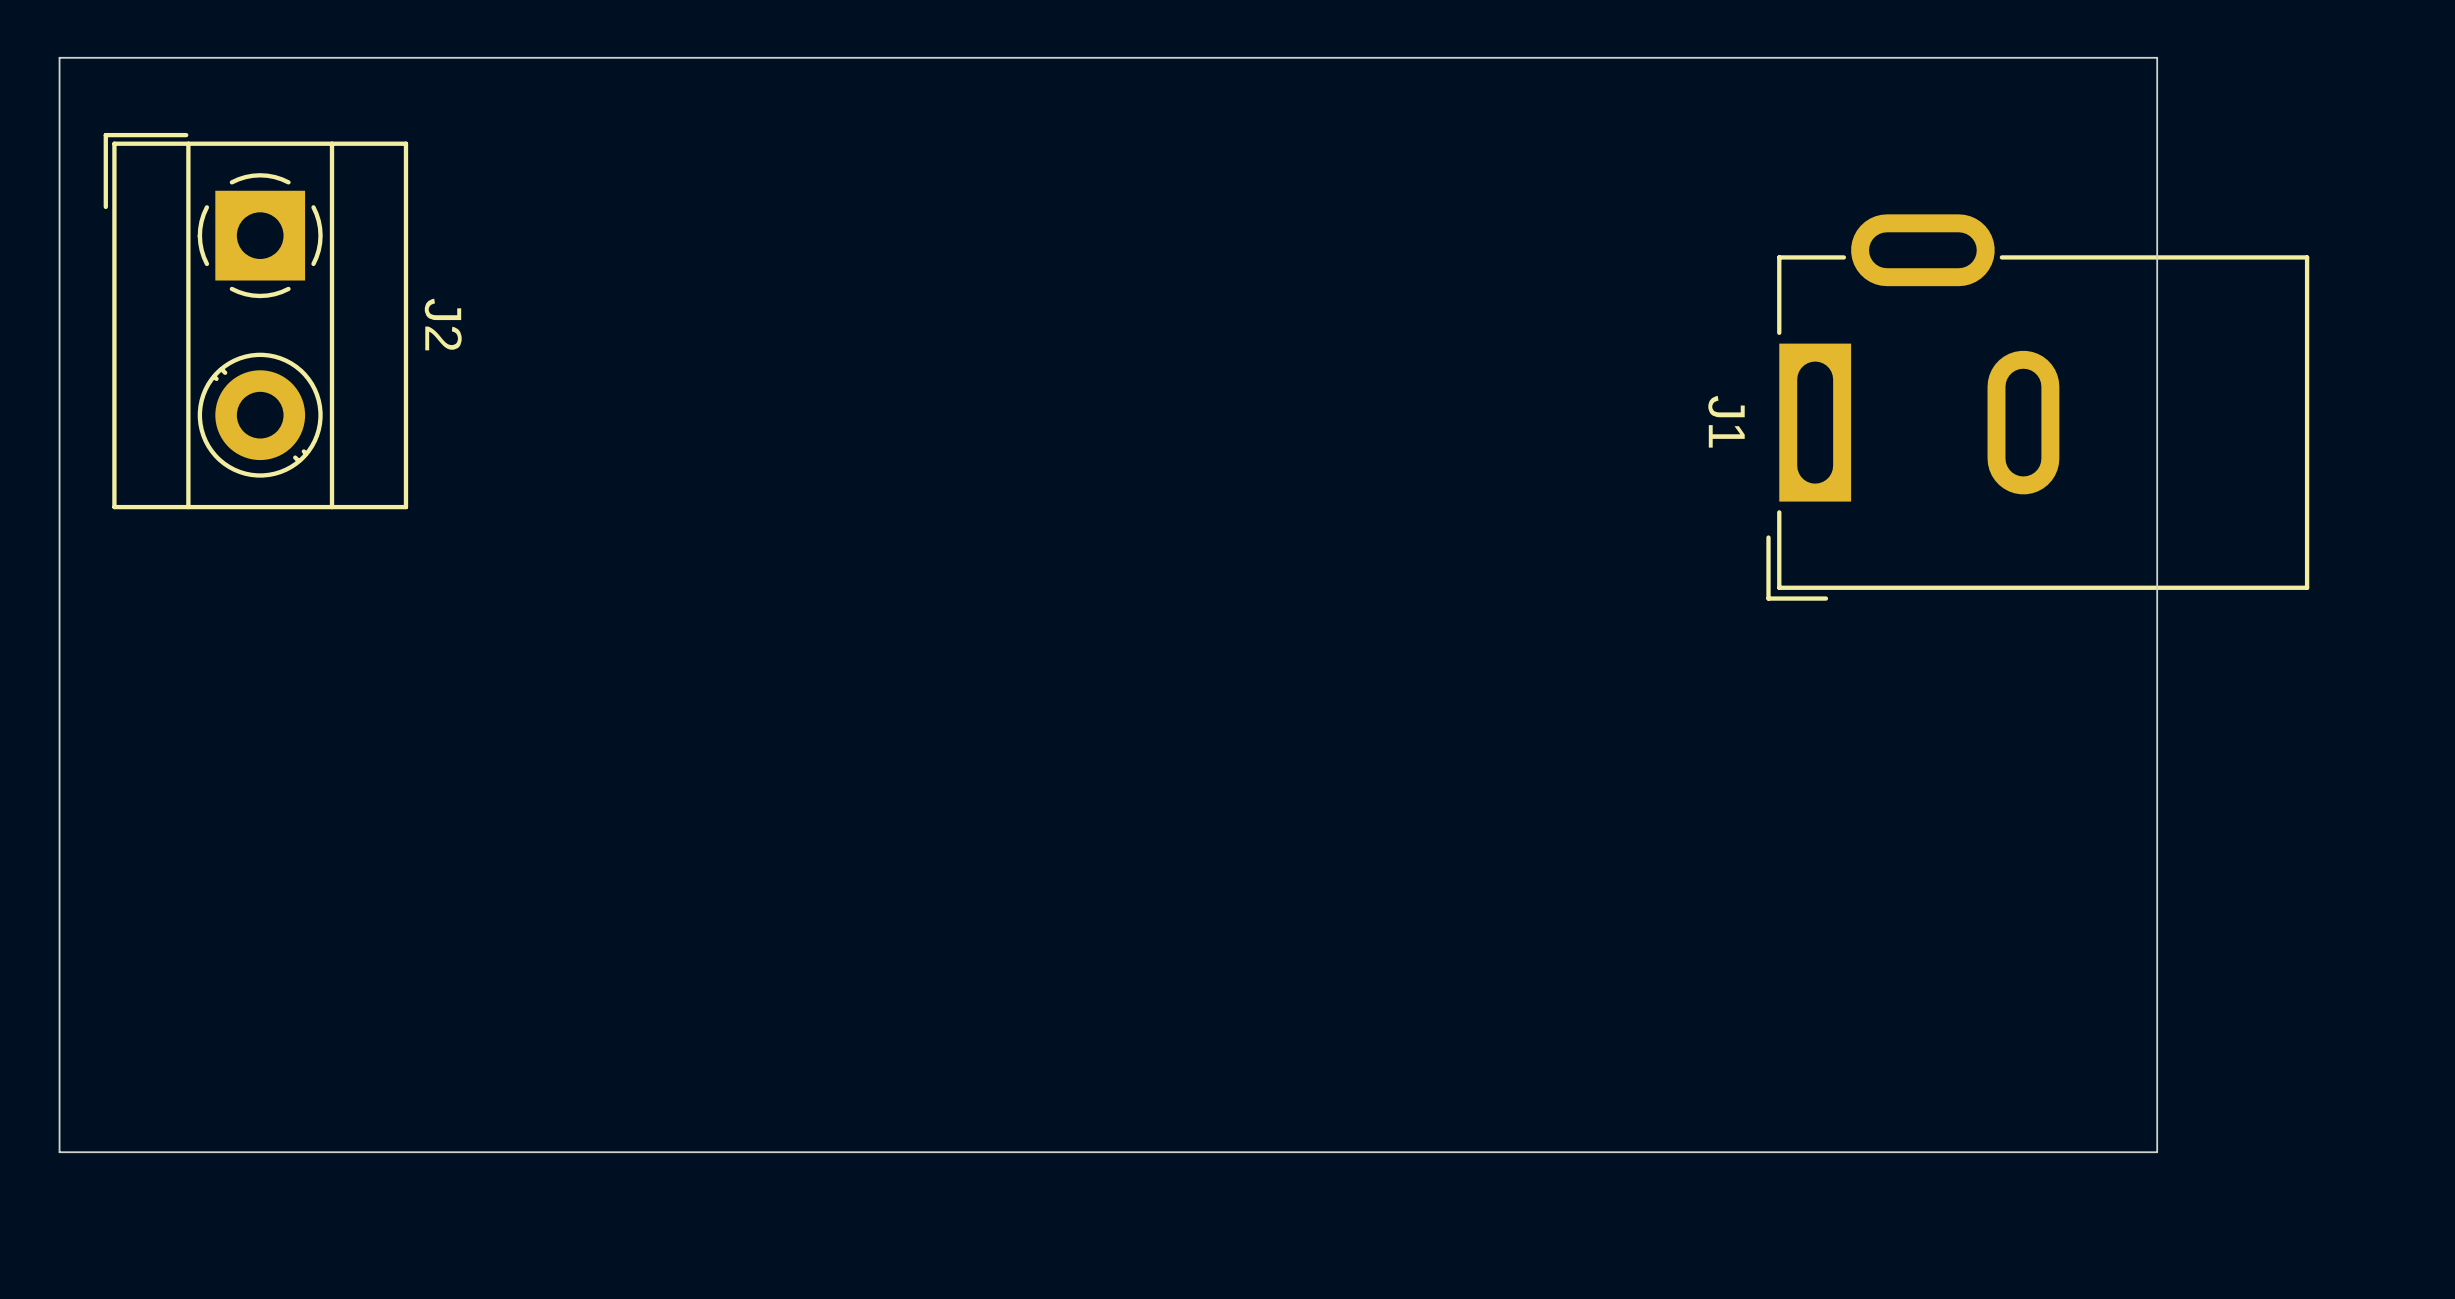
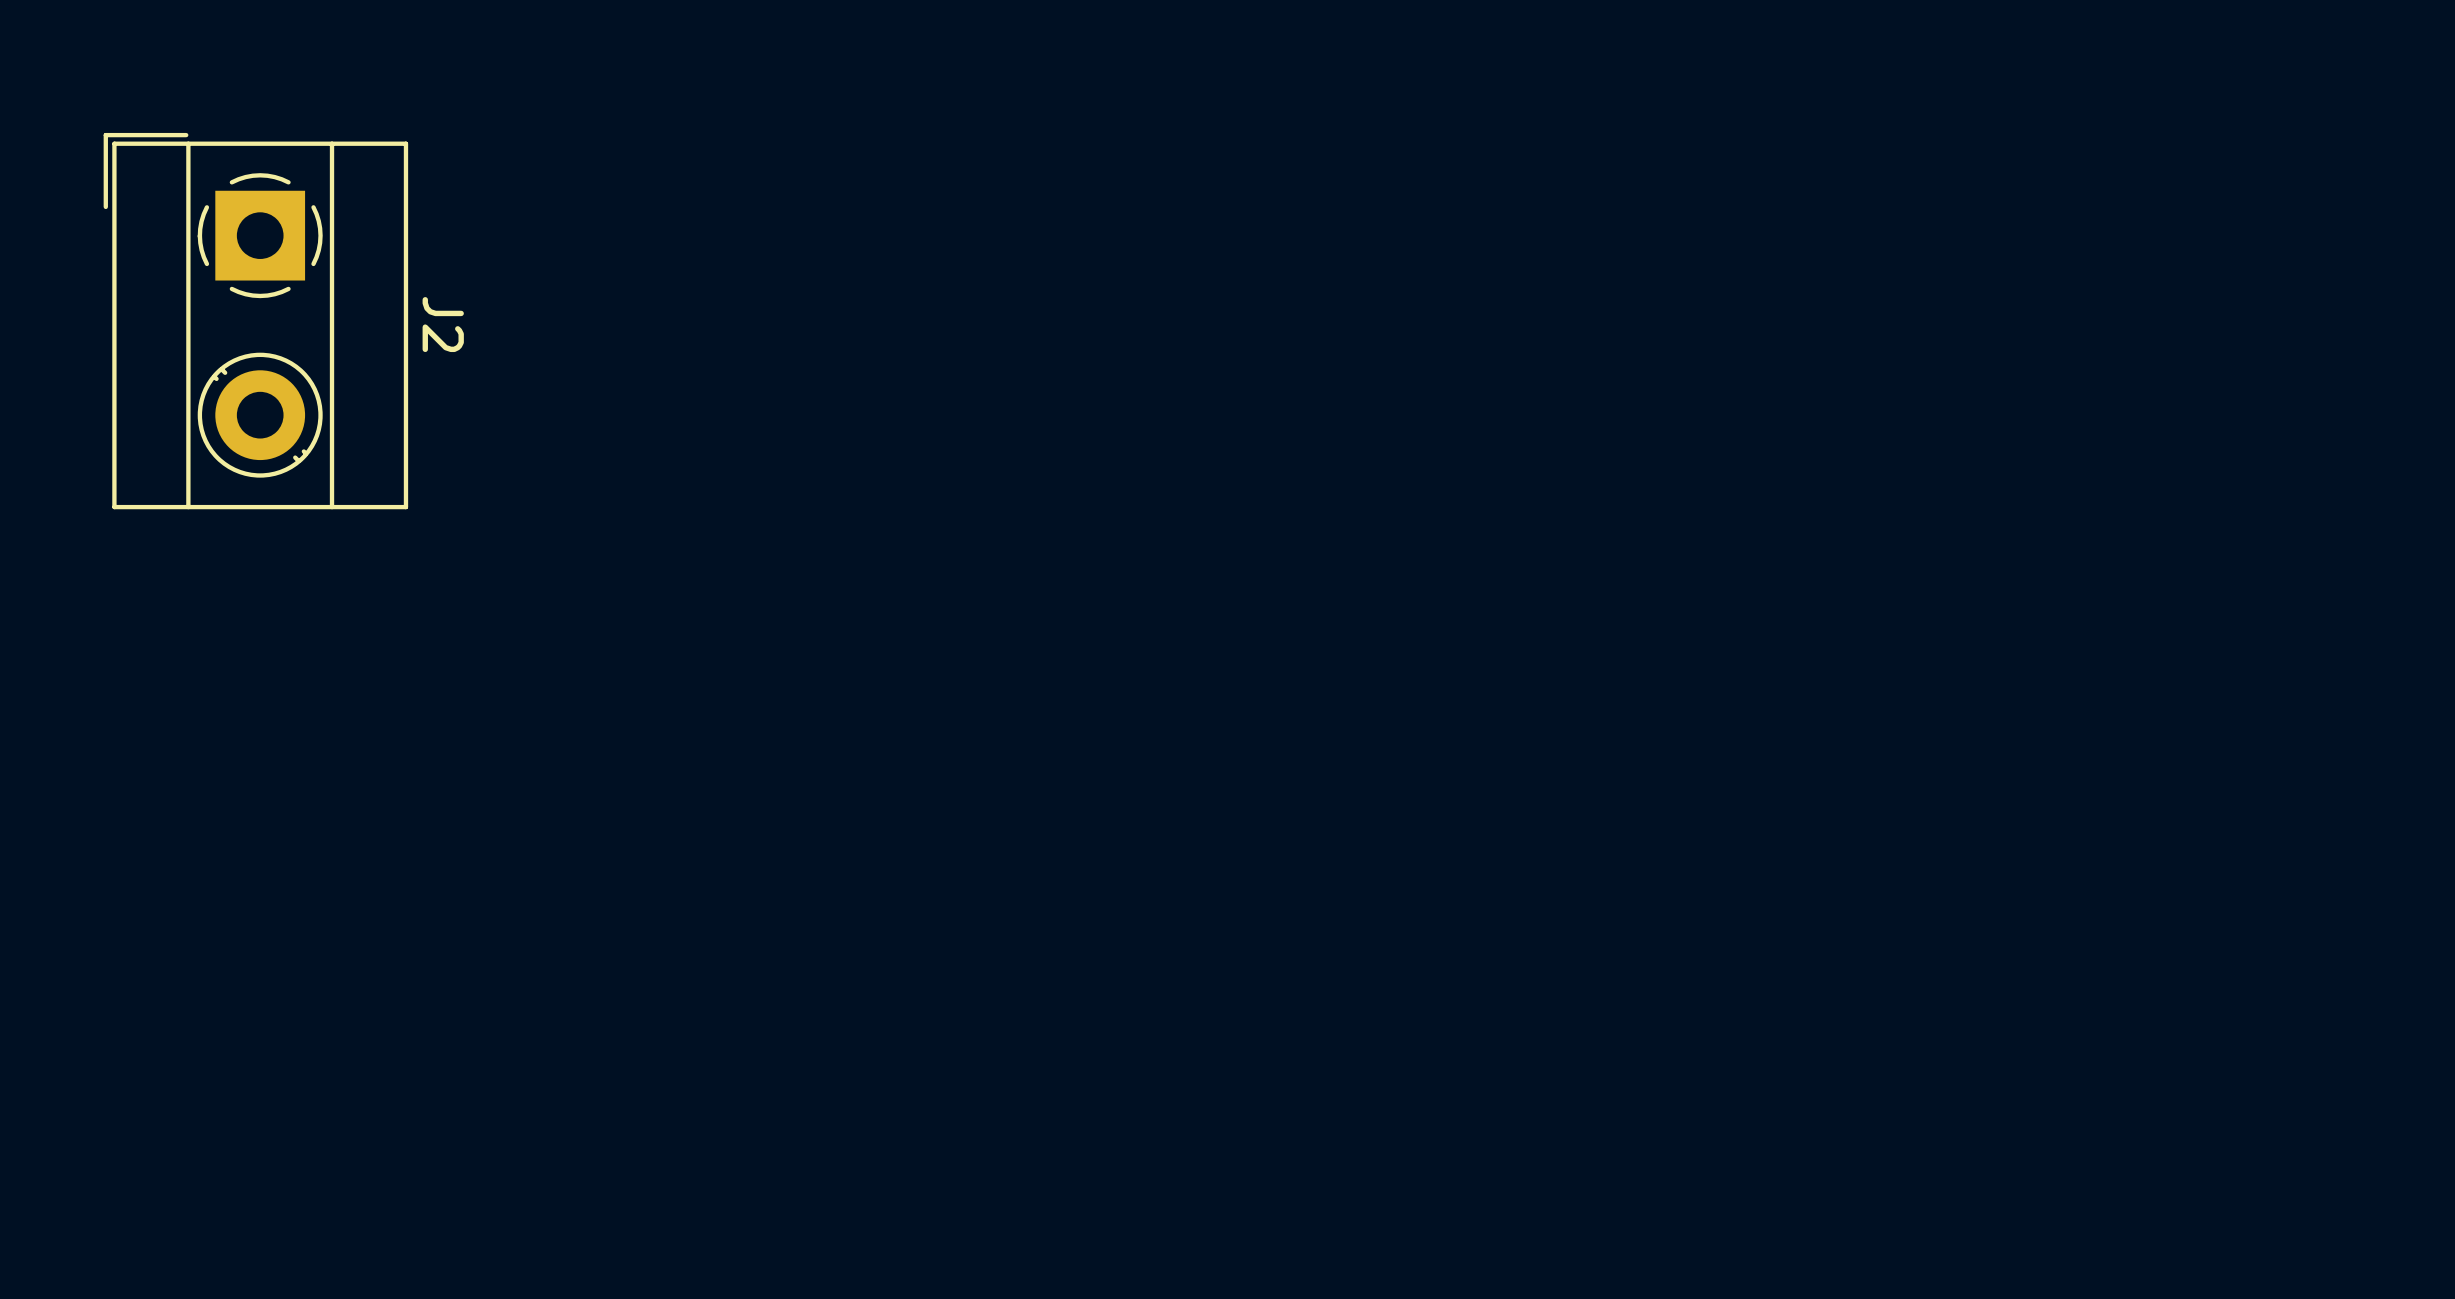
board edge: (2157, 57) (2157, 1152) (59, 1152) (59, 57) (2157, 57) -> none
J1: (2037, 407) -> none

